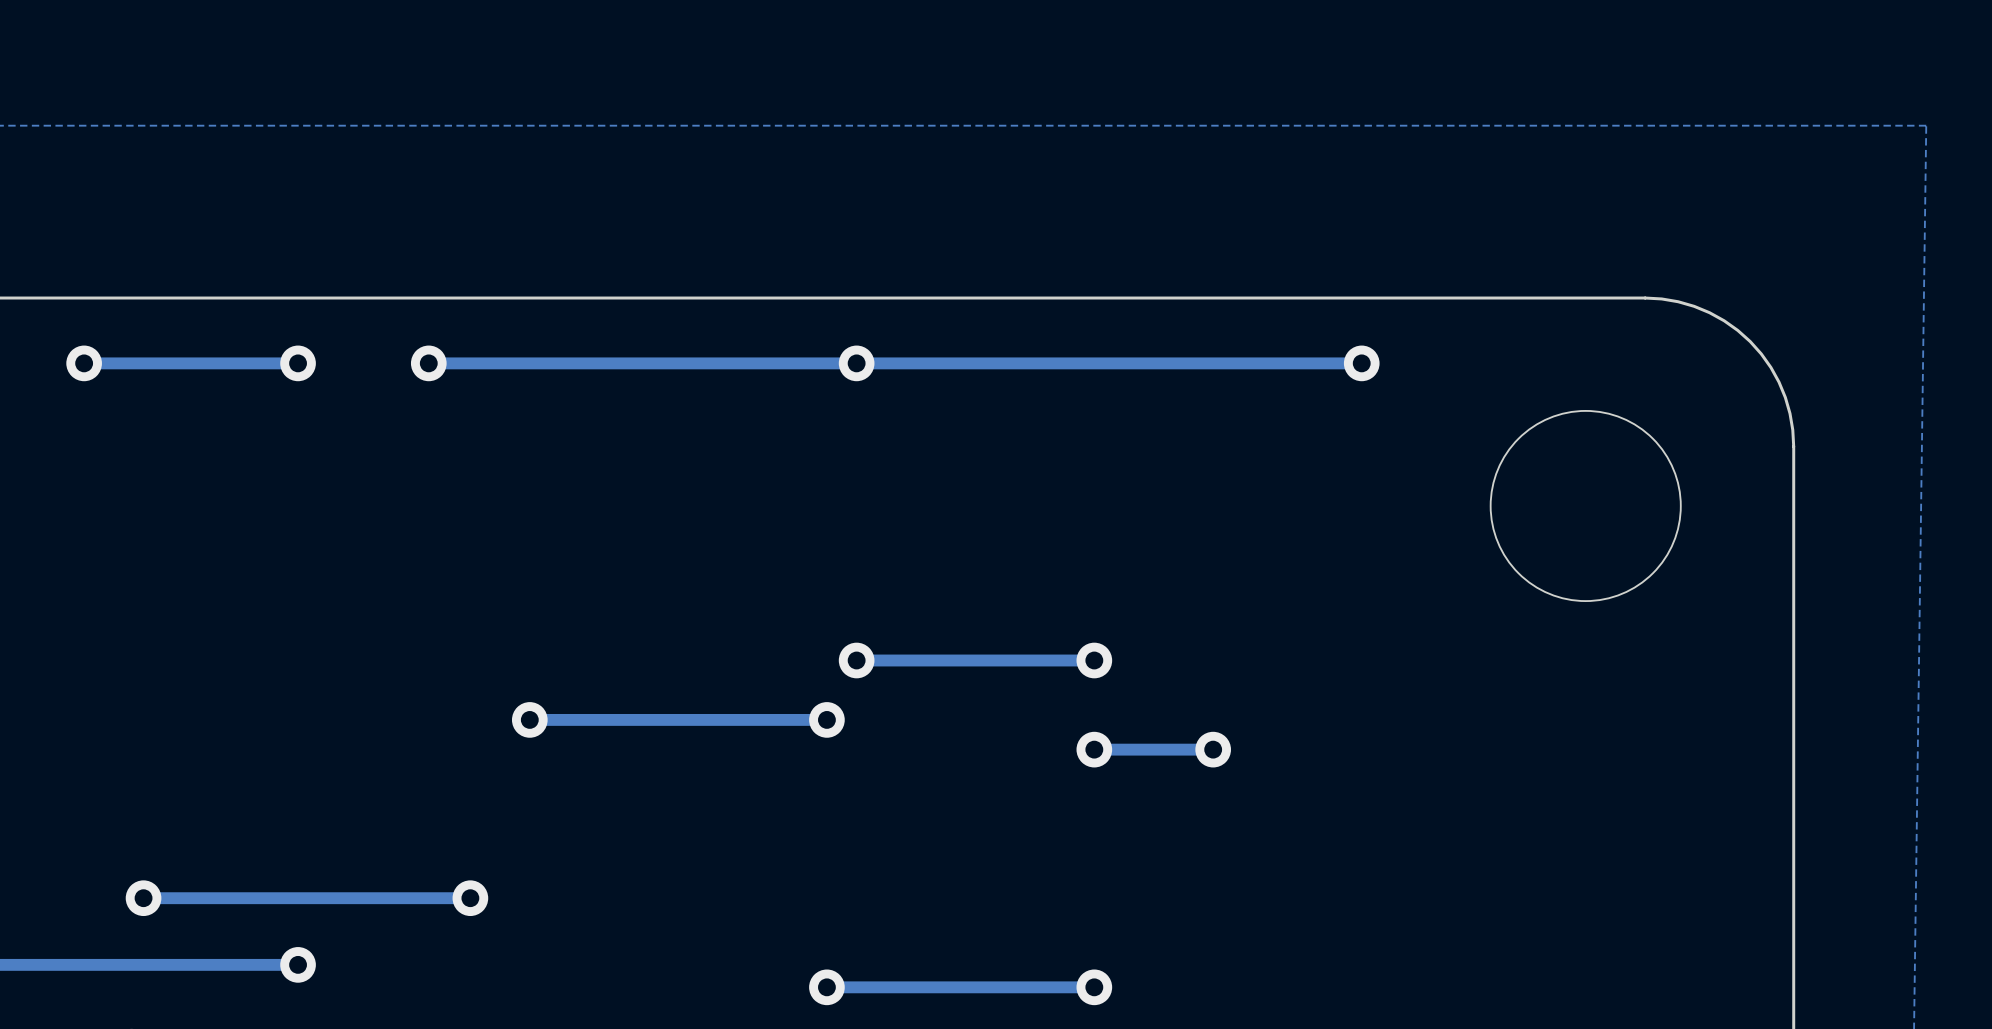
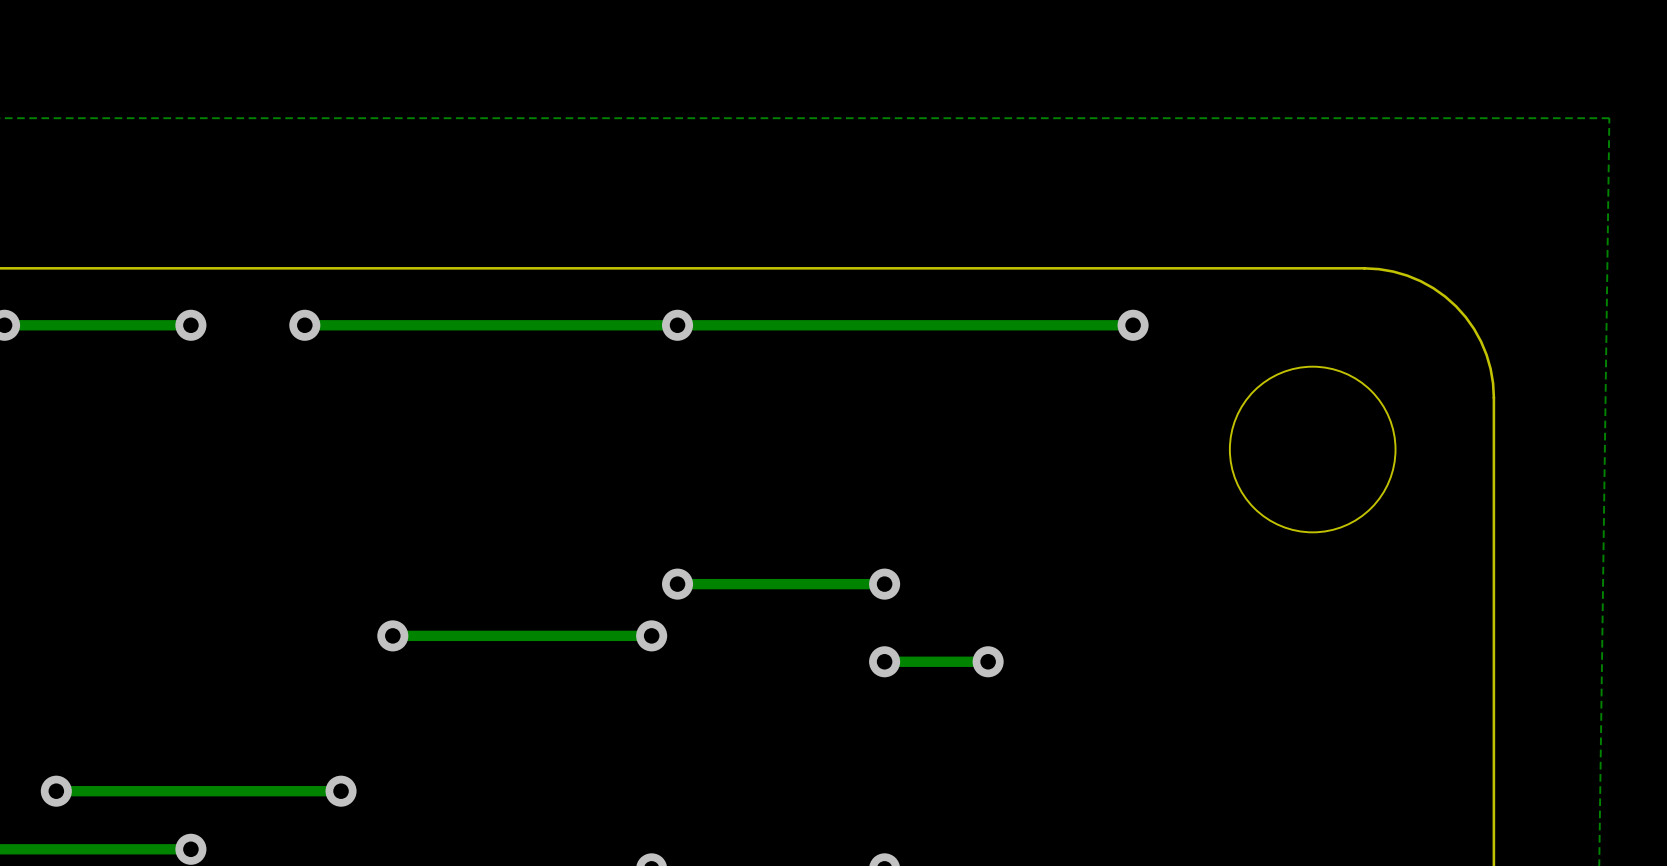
via position: (1361, 363) -> (1133, 325)

